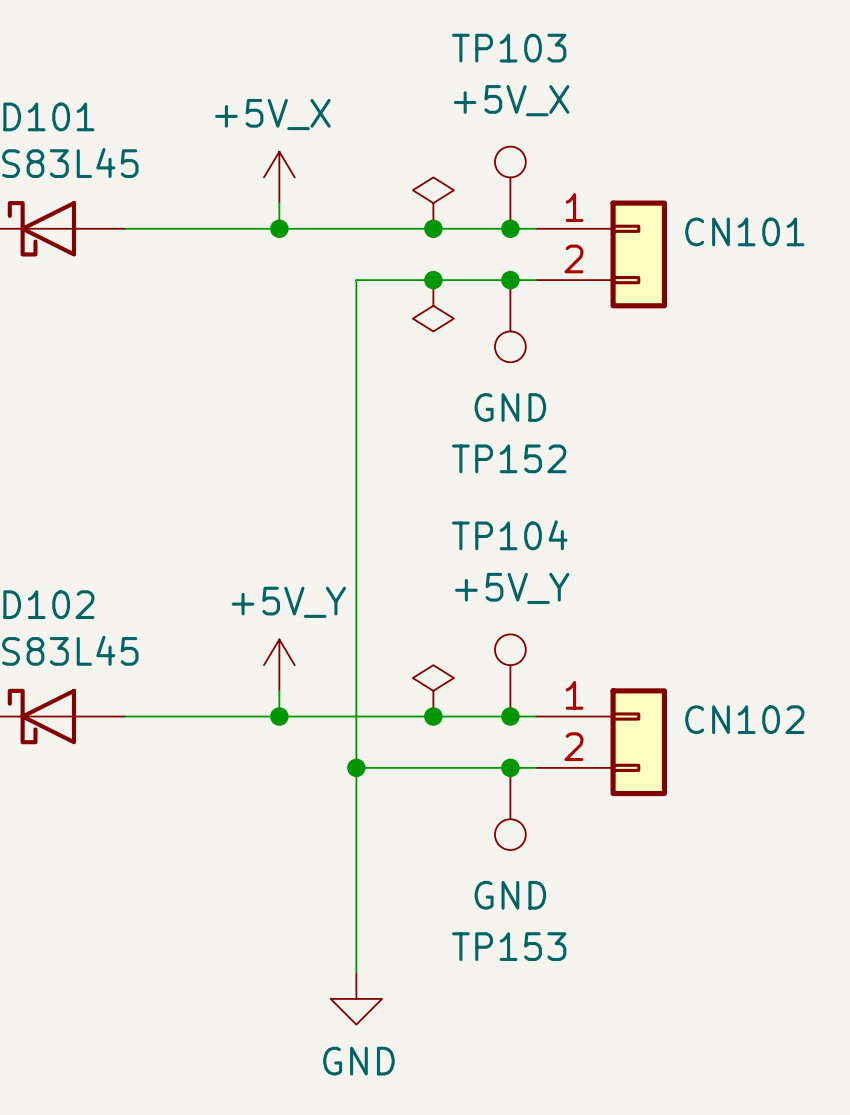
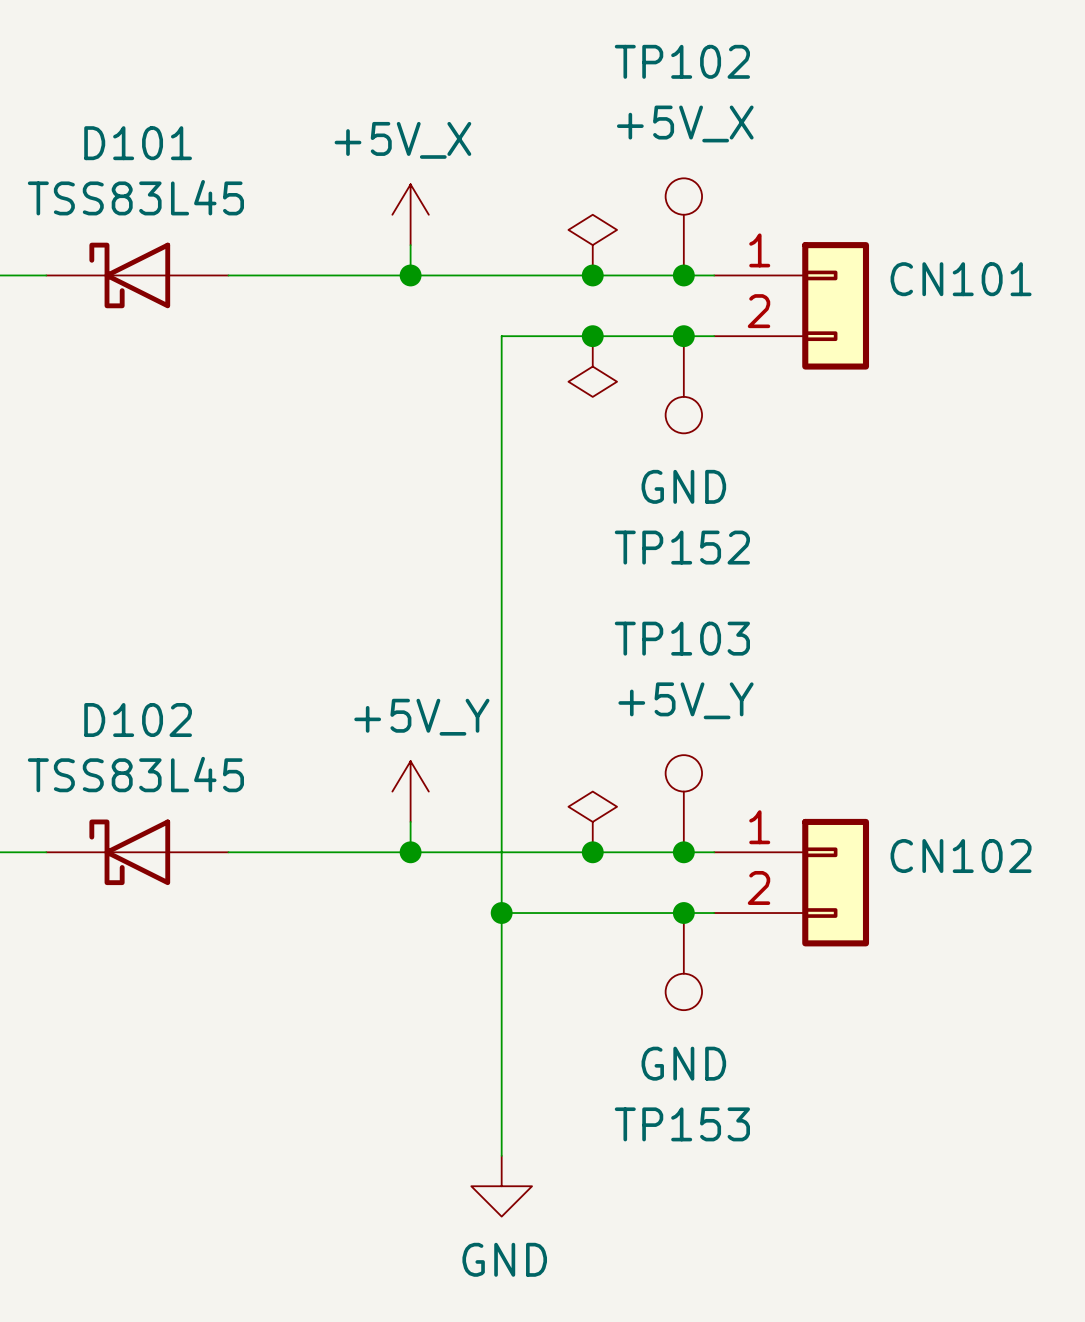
TP103 name: TP103 (509, 48) -> TP102 (682, 61)
TP104 name: TP104 (509, 535) -> TP103 (682, 638)

